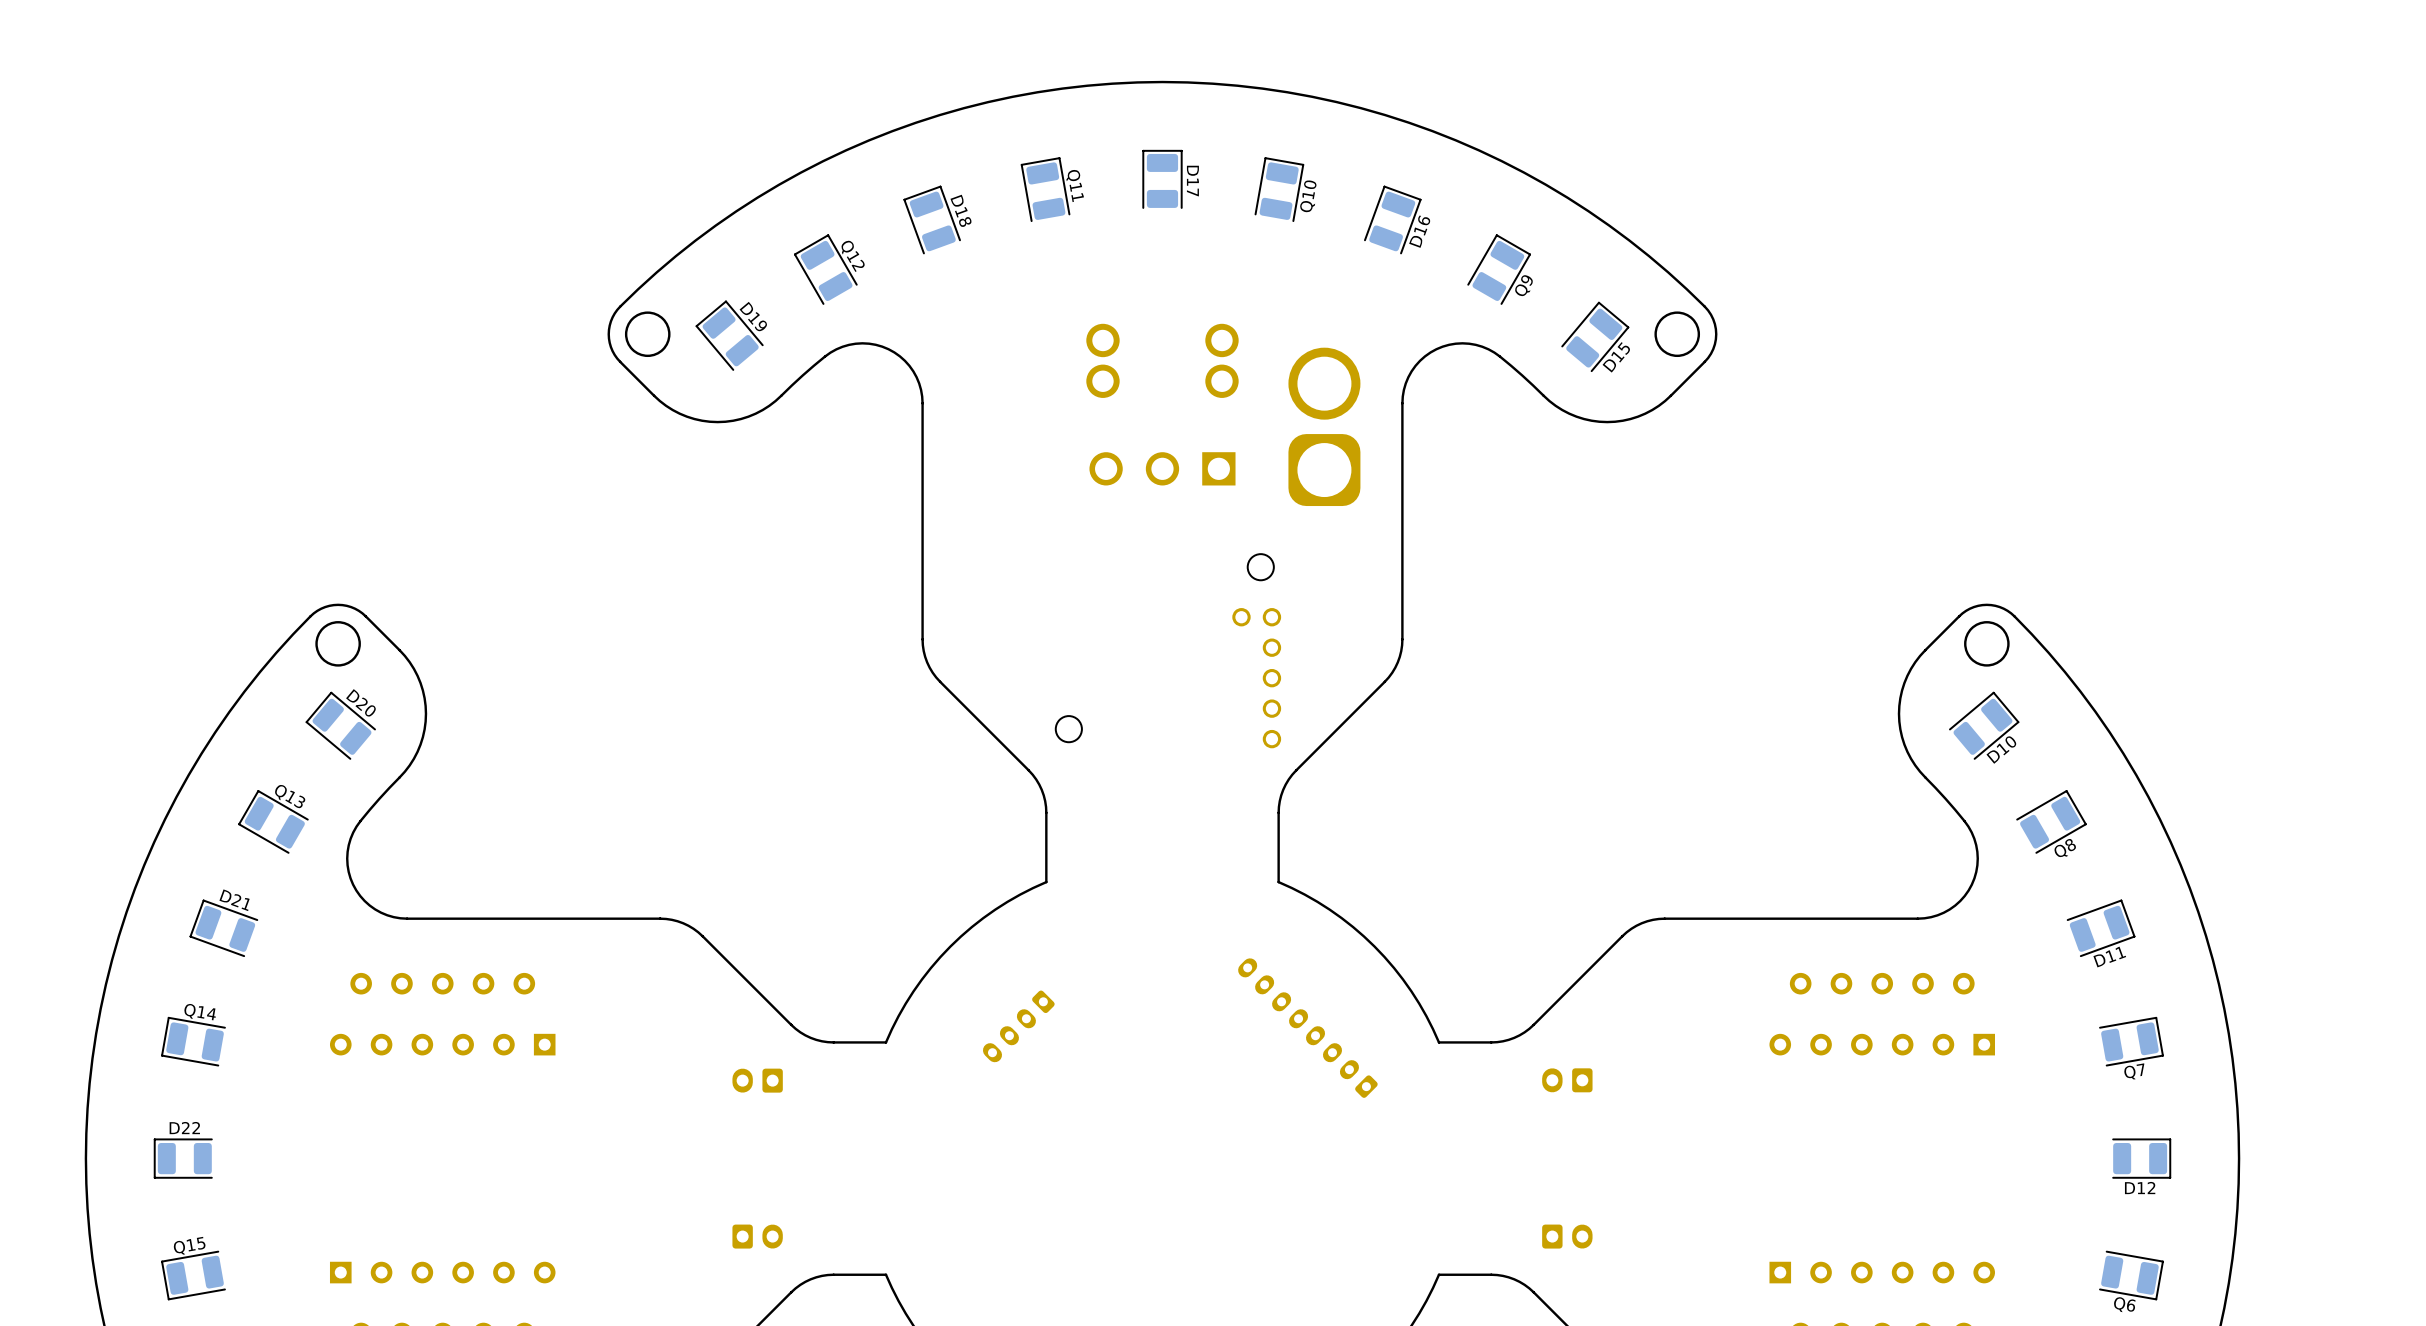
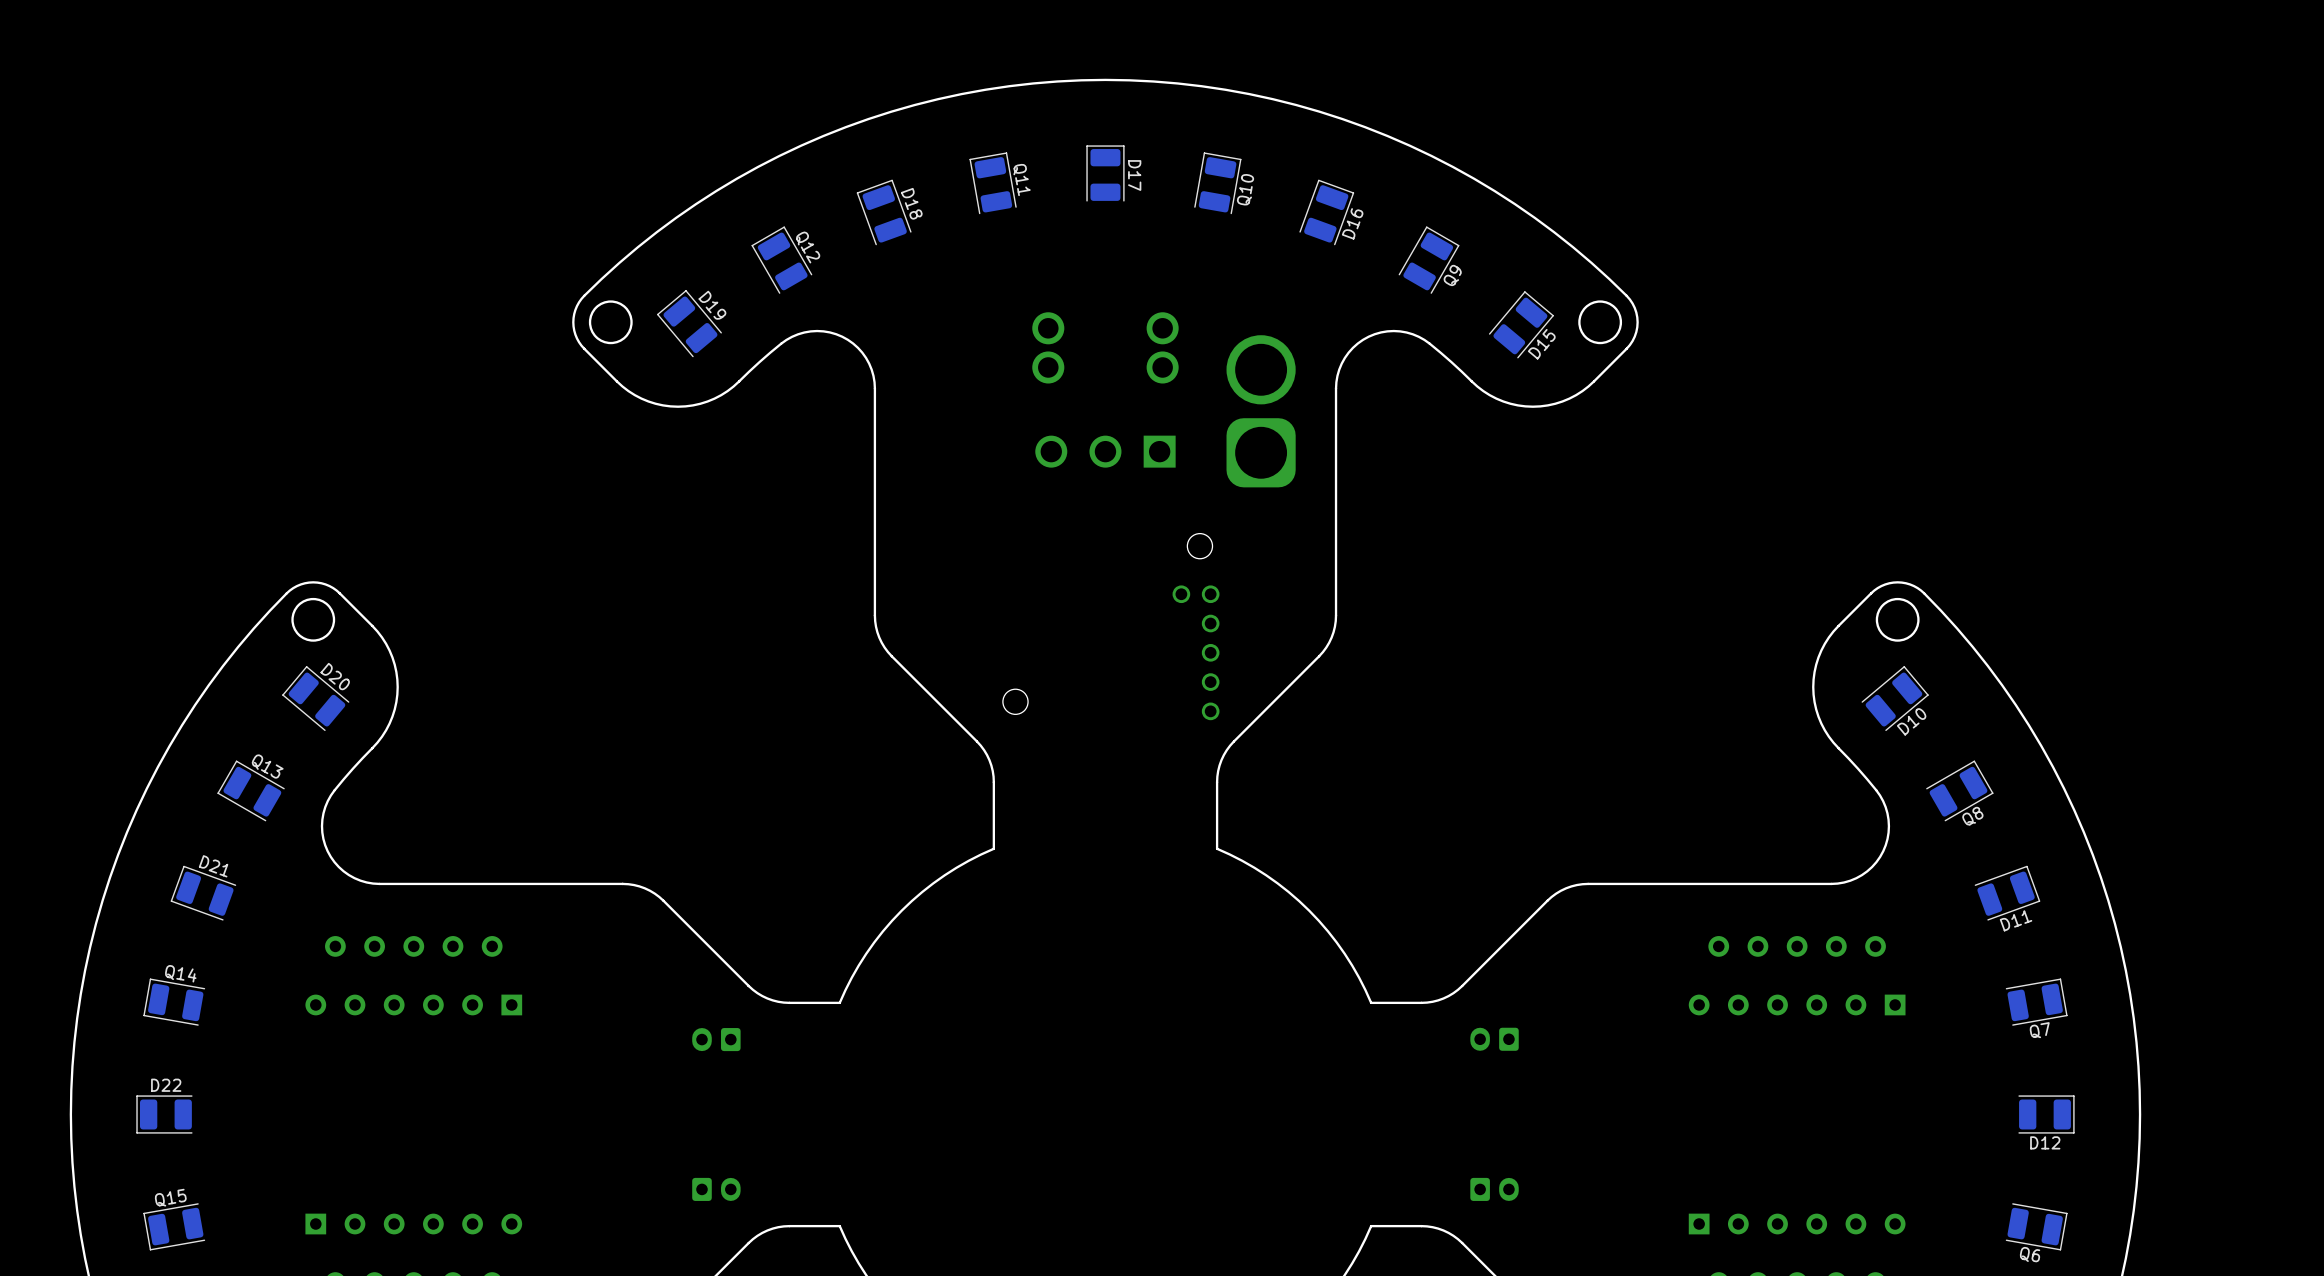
part: (1018, 1026) -> none
part: (1307, 1028) -> none

